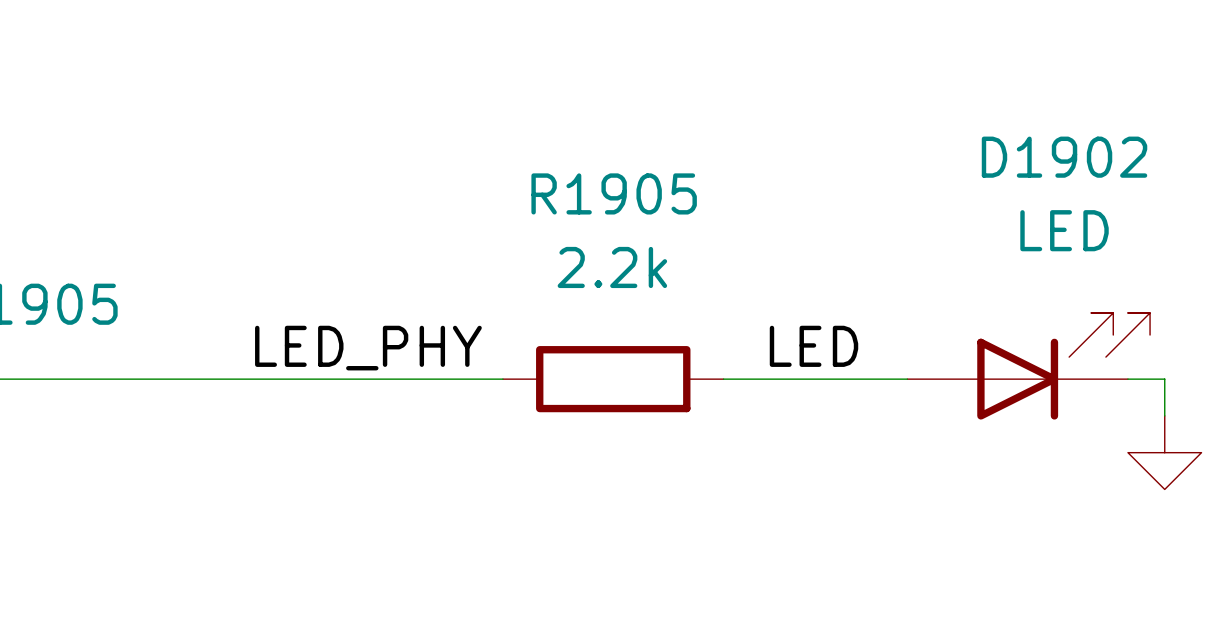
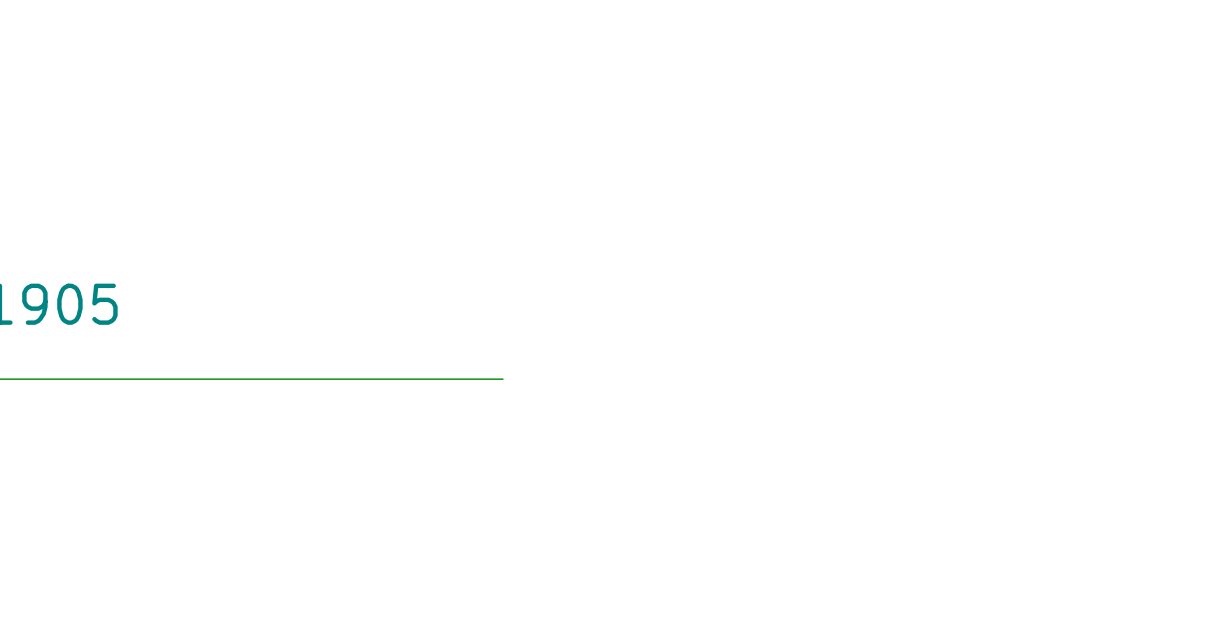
label: LED (814, 346) -> none
label: LED_PHY (368, 348) -> none
D1902: LED (1028, 366) -> none
R1905: 2.2k (613, 379) -> none
wire: (723, 379) (907, 379) -> none
wire: (1127, 379) (1164, 379) (1164, 415) -> none
power symbol: (1164, 452) -> none

